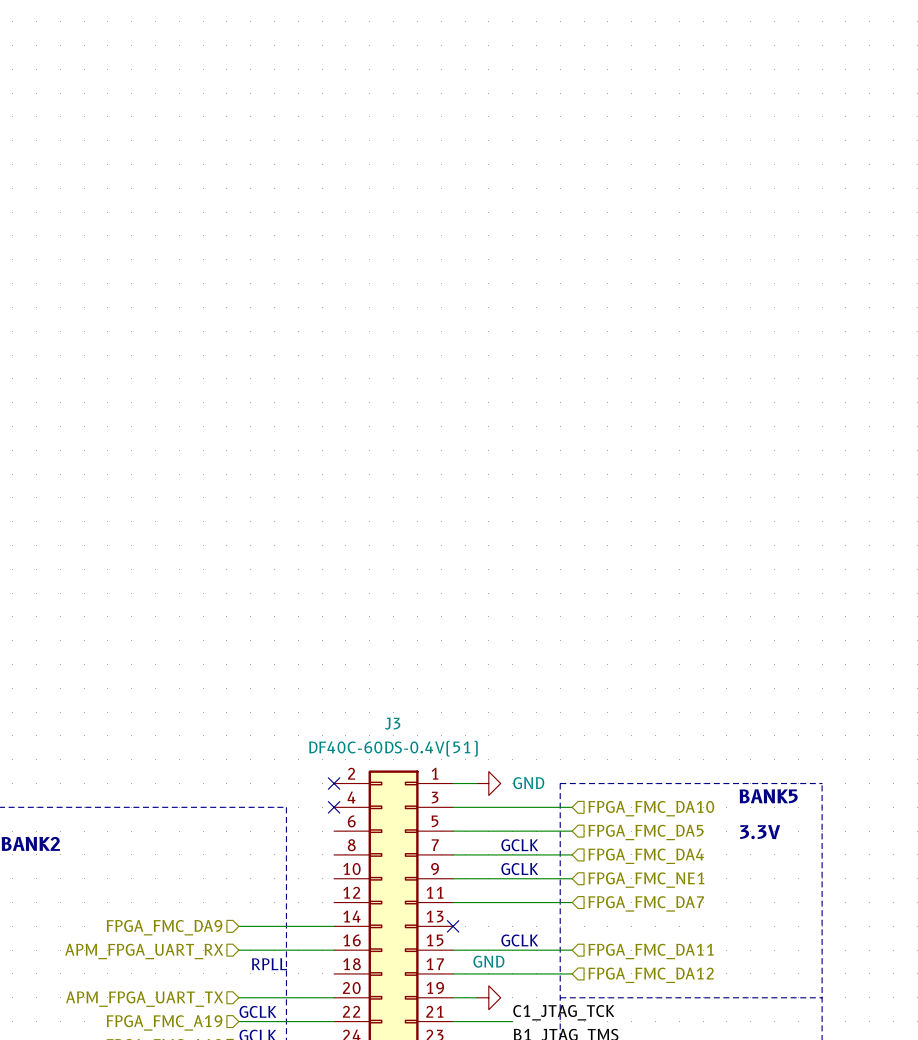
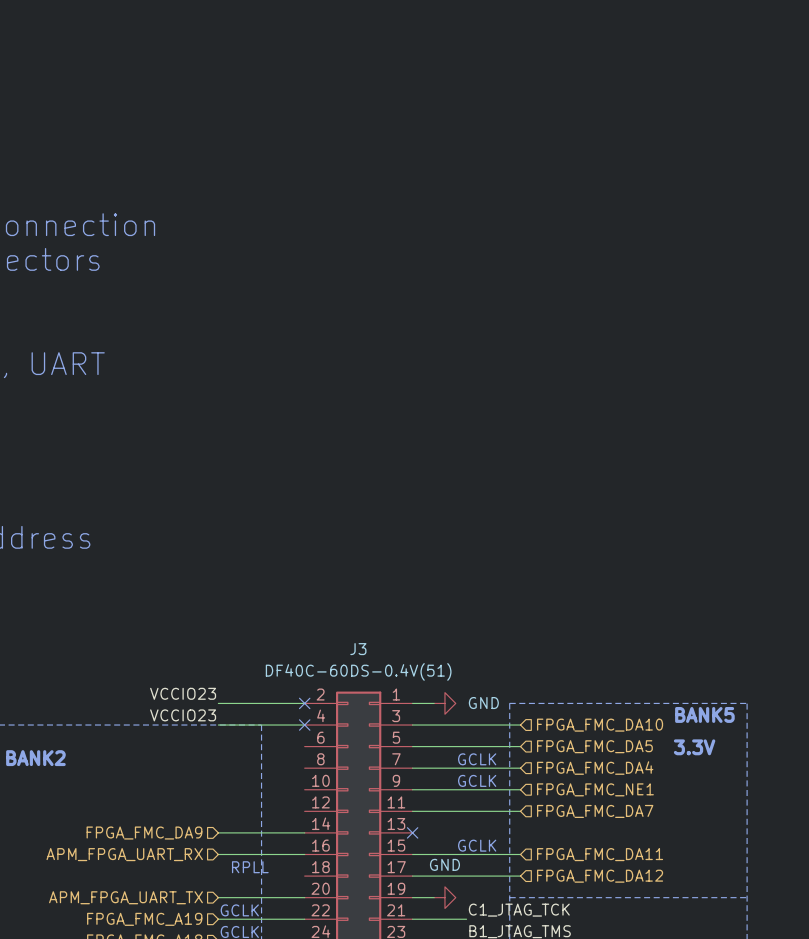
label: none -> VCCIO23 (183, 693)
wire: none -> (218, 703) (304, 703)
label: none -> VCCIO23 (183, 715)
wire: none -> (218, 725) (304, 725)

